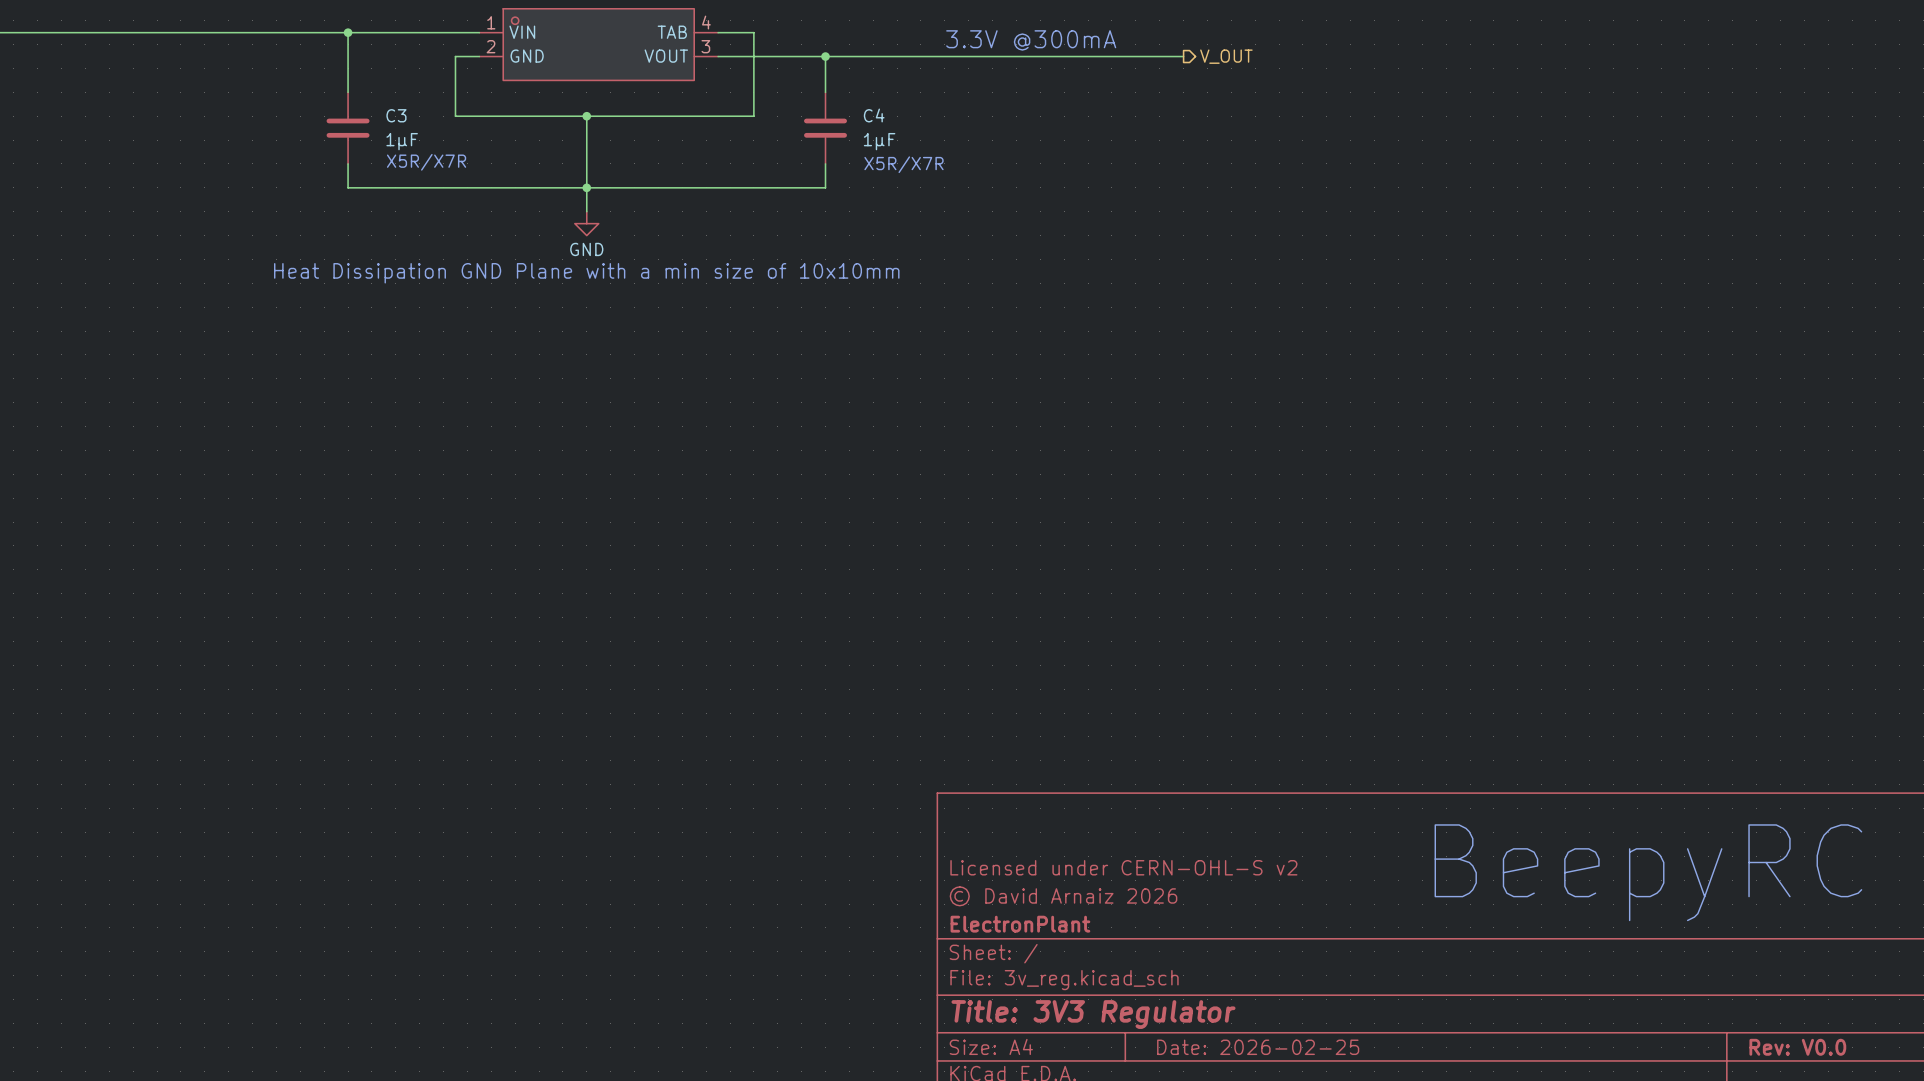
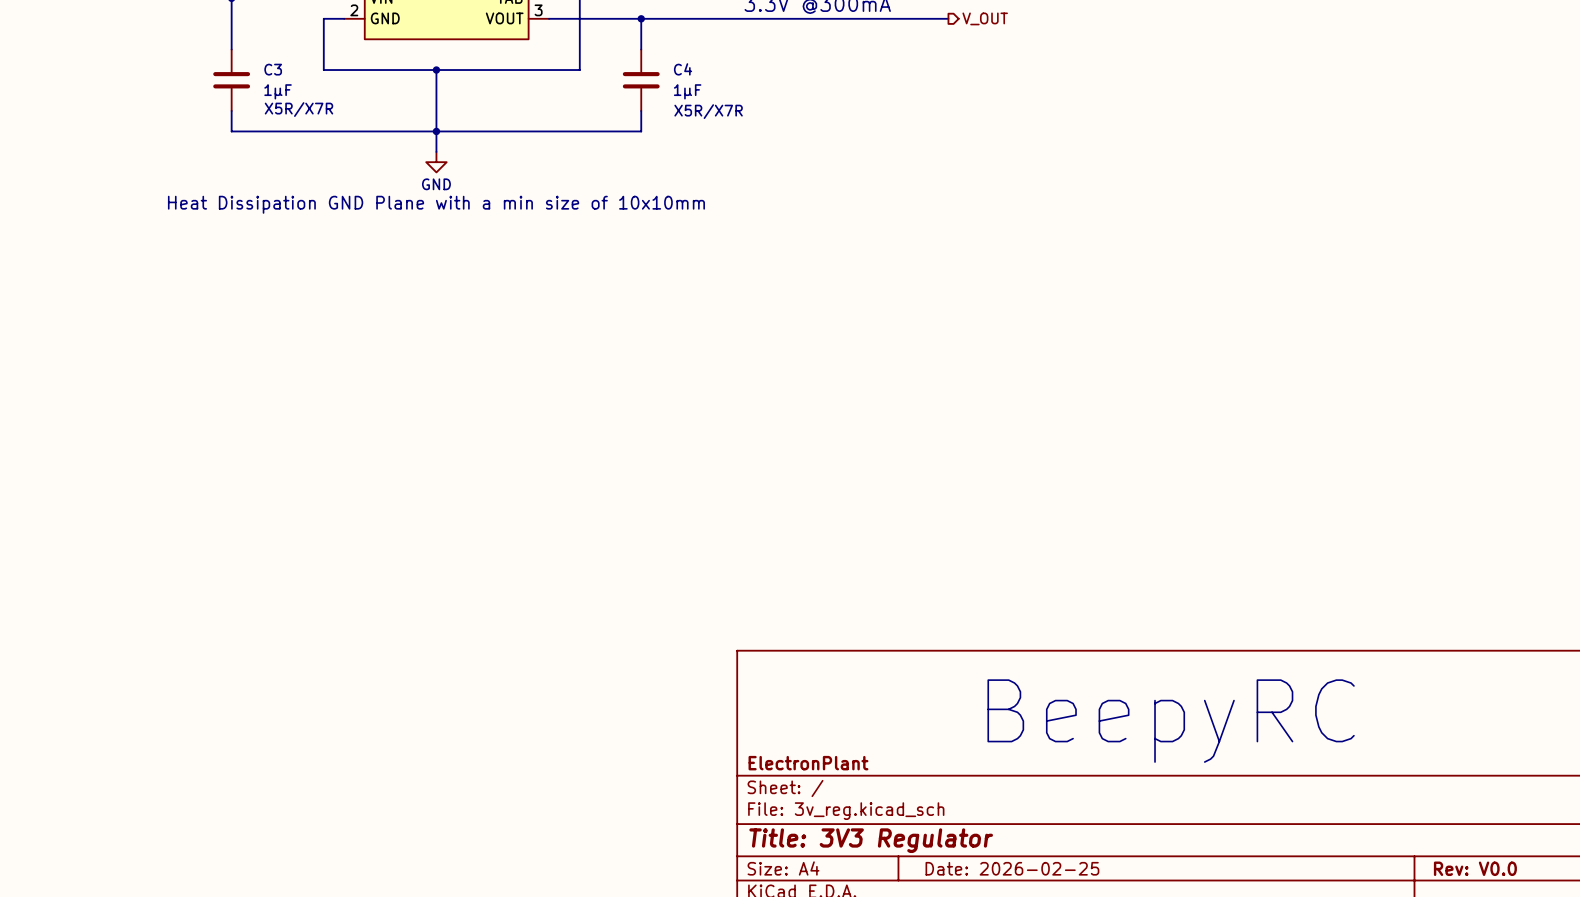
title block: Licensed under CERN-OHL-S v2 (1123, 867) -> none
text position: BeepyRC (1648, 872) -> BeepyRC (1171, 721)
title block: © David Arnaiz 2026 (1063, 896) -> none

